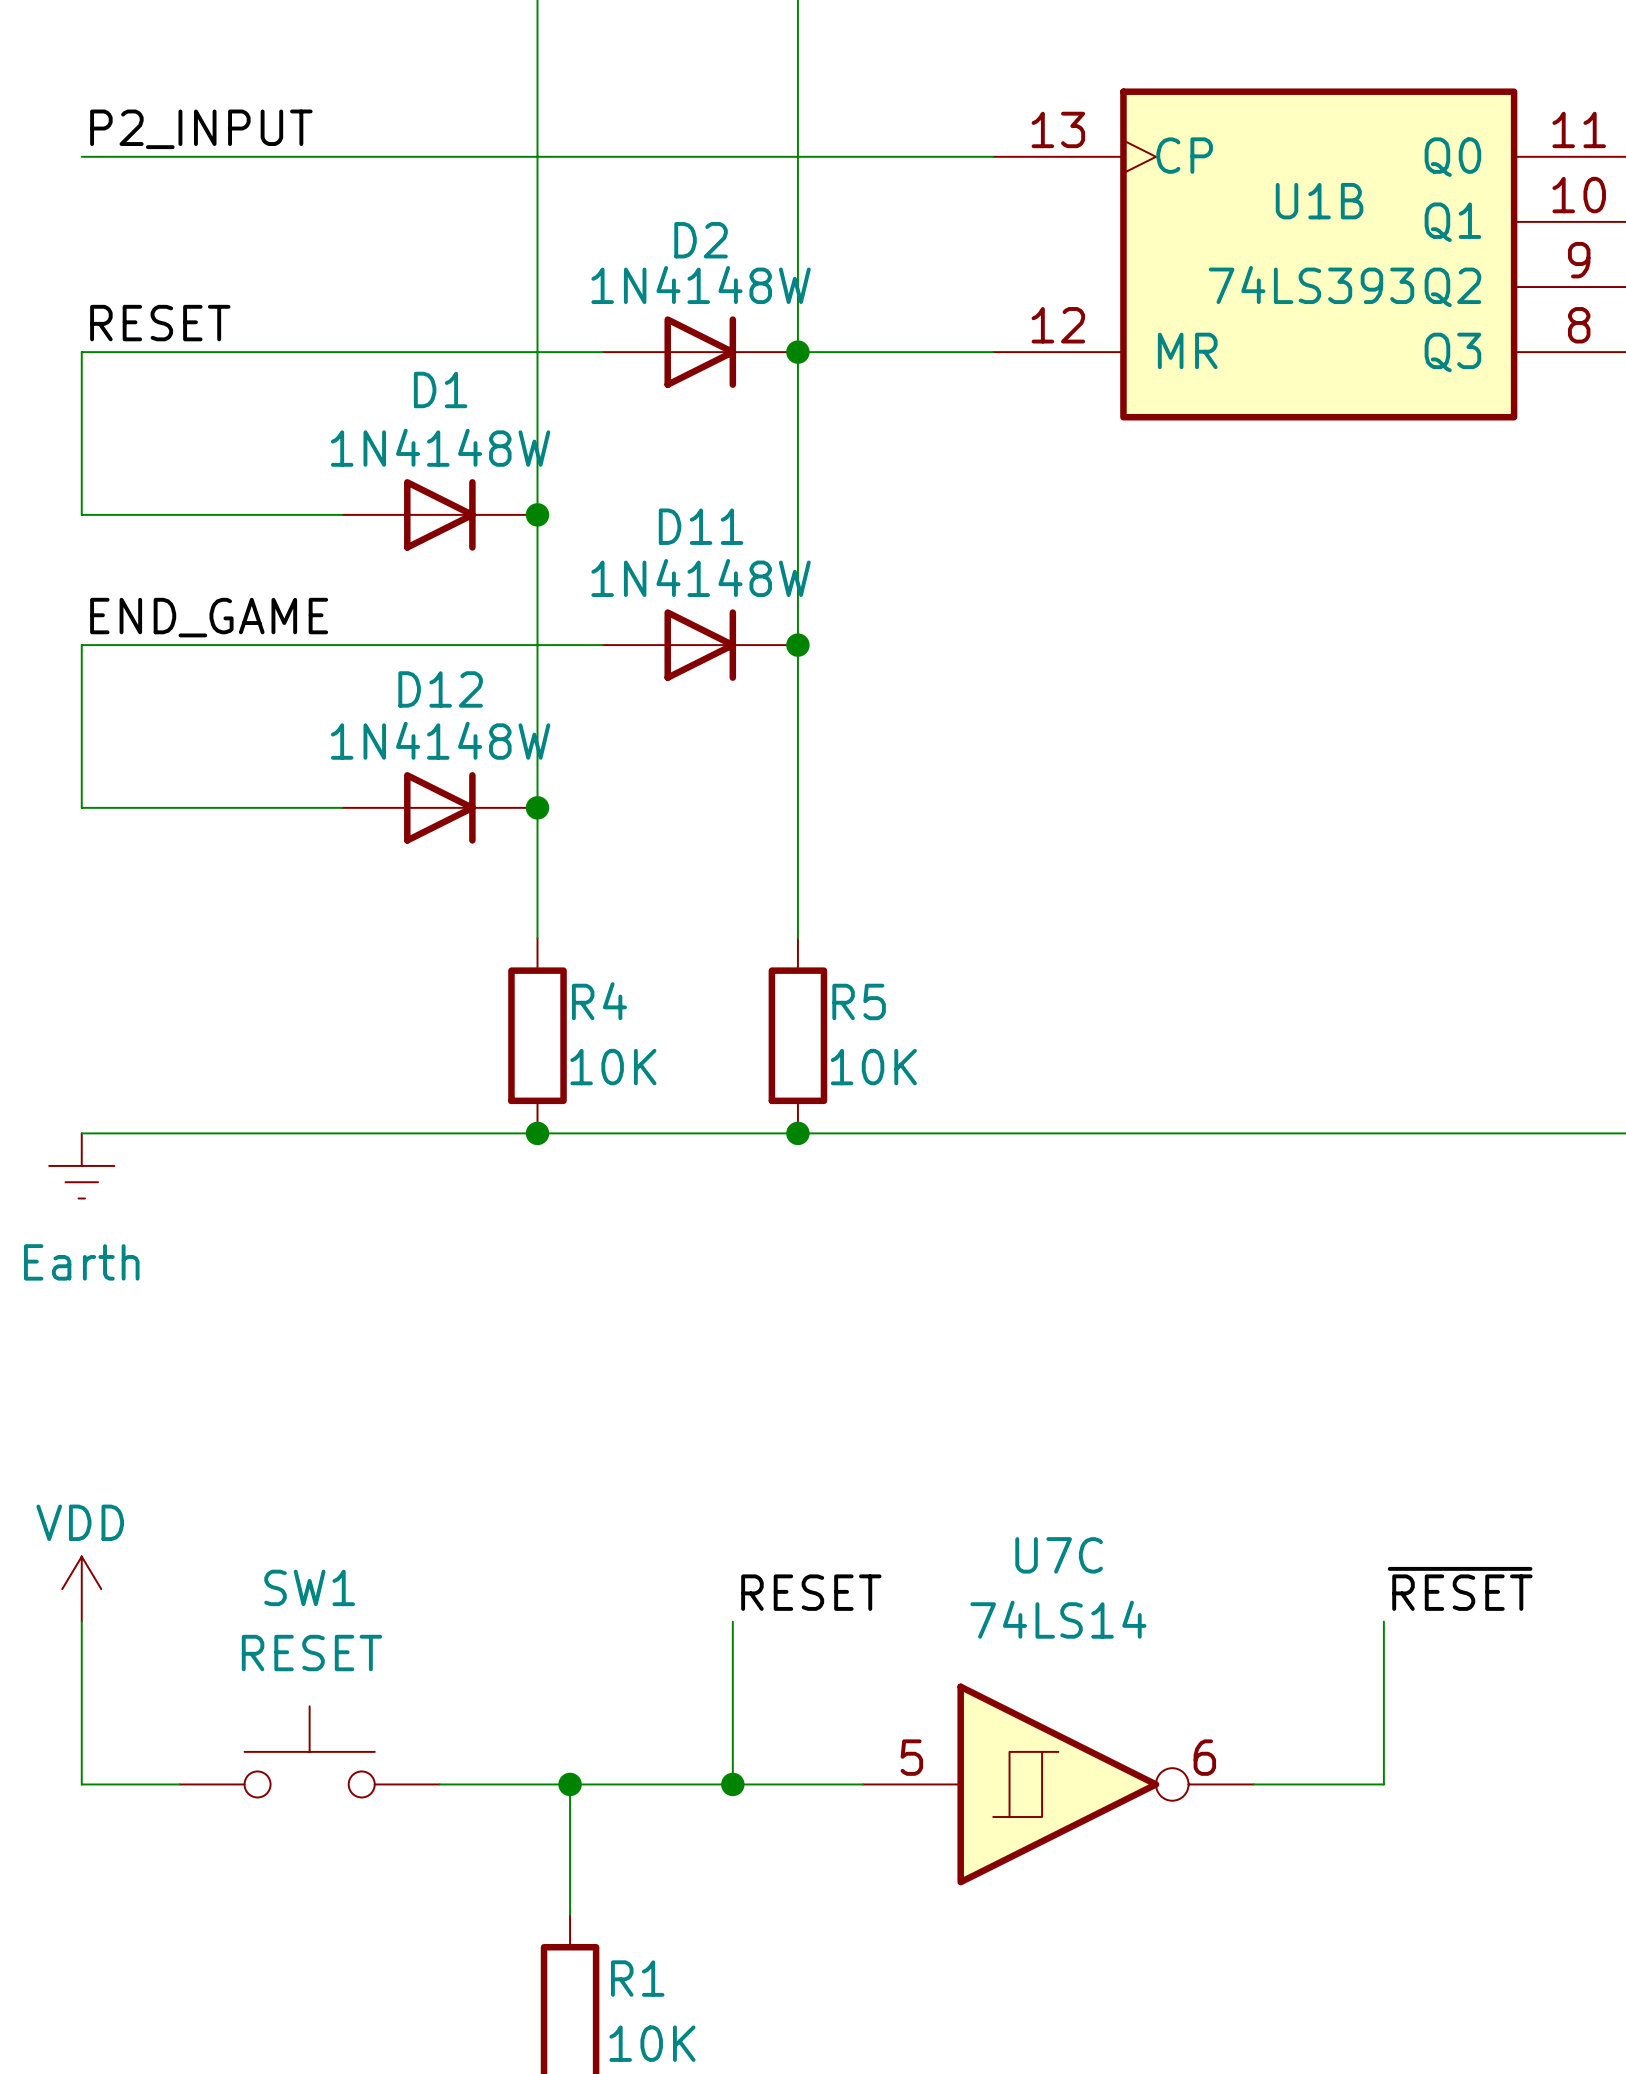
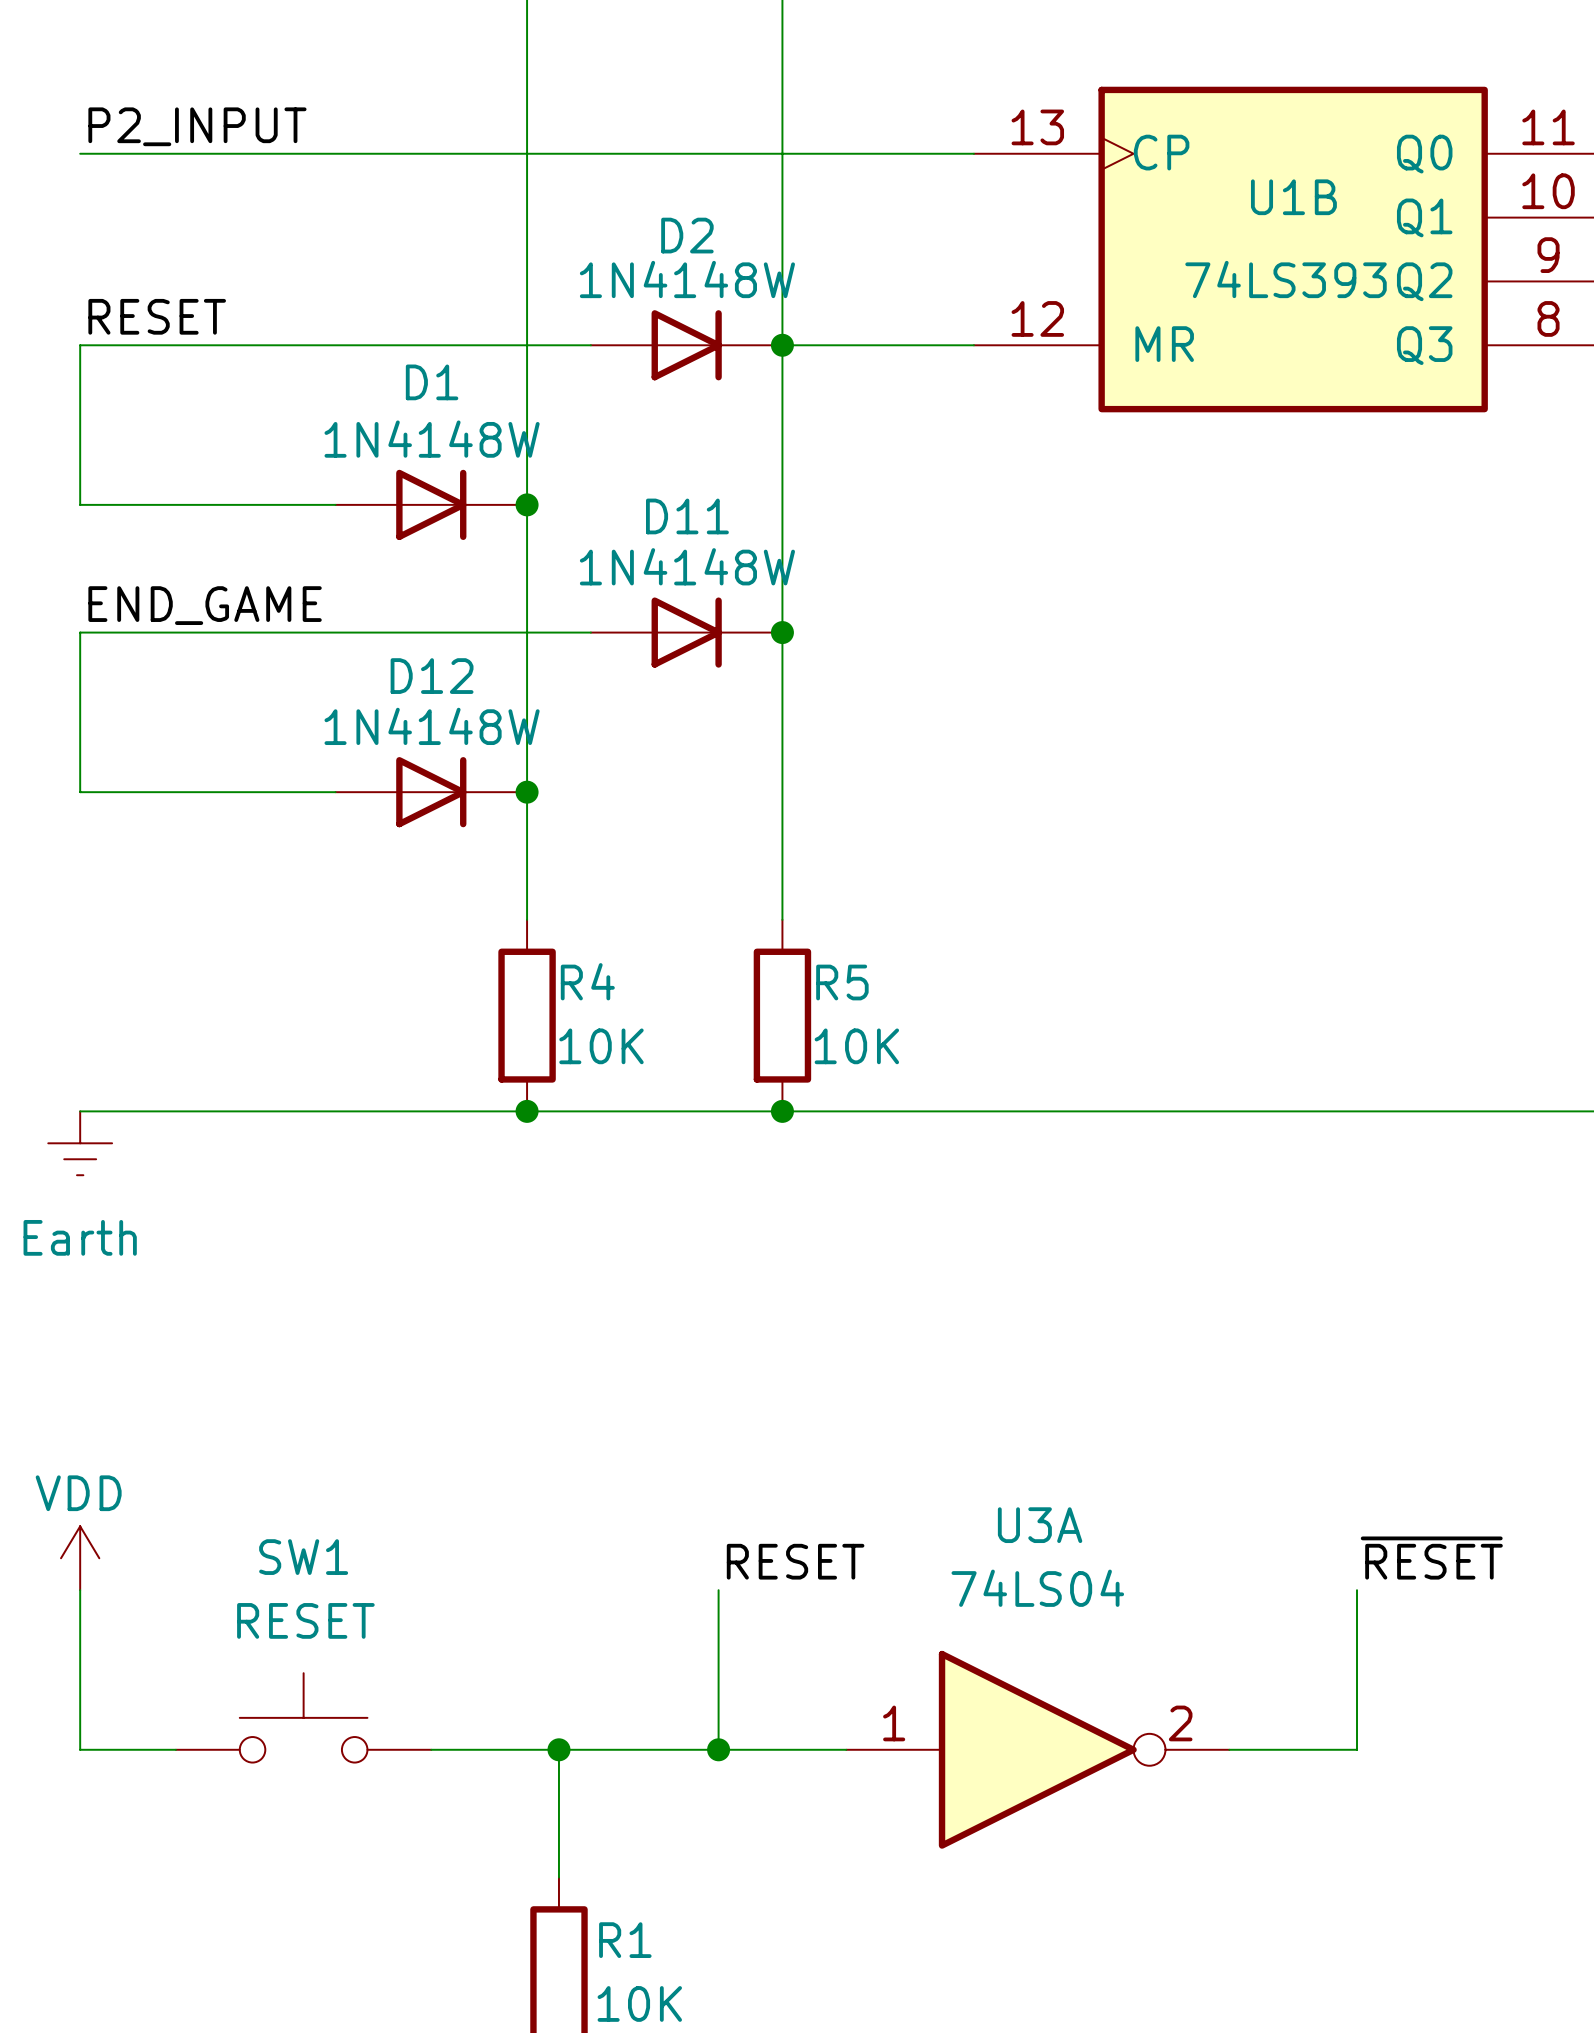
U7C: 74LS14 (1058, 1784) -> none
U3A: none -> 74LS04 (1037, 1749)

